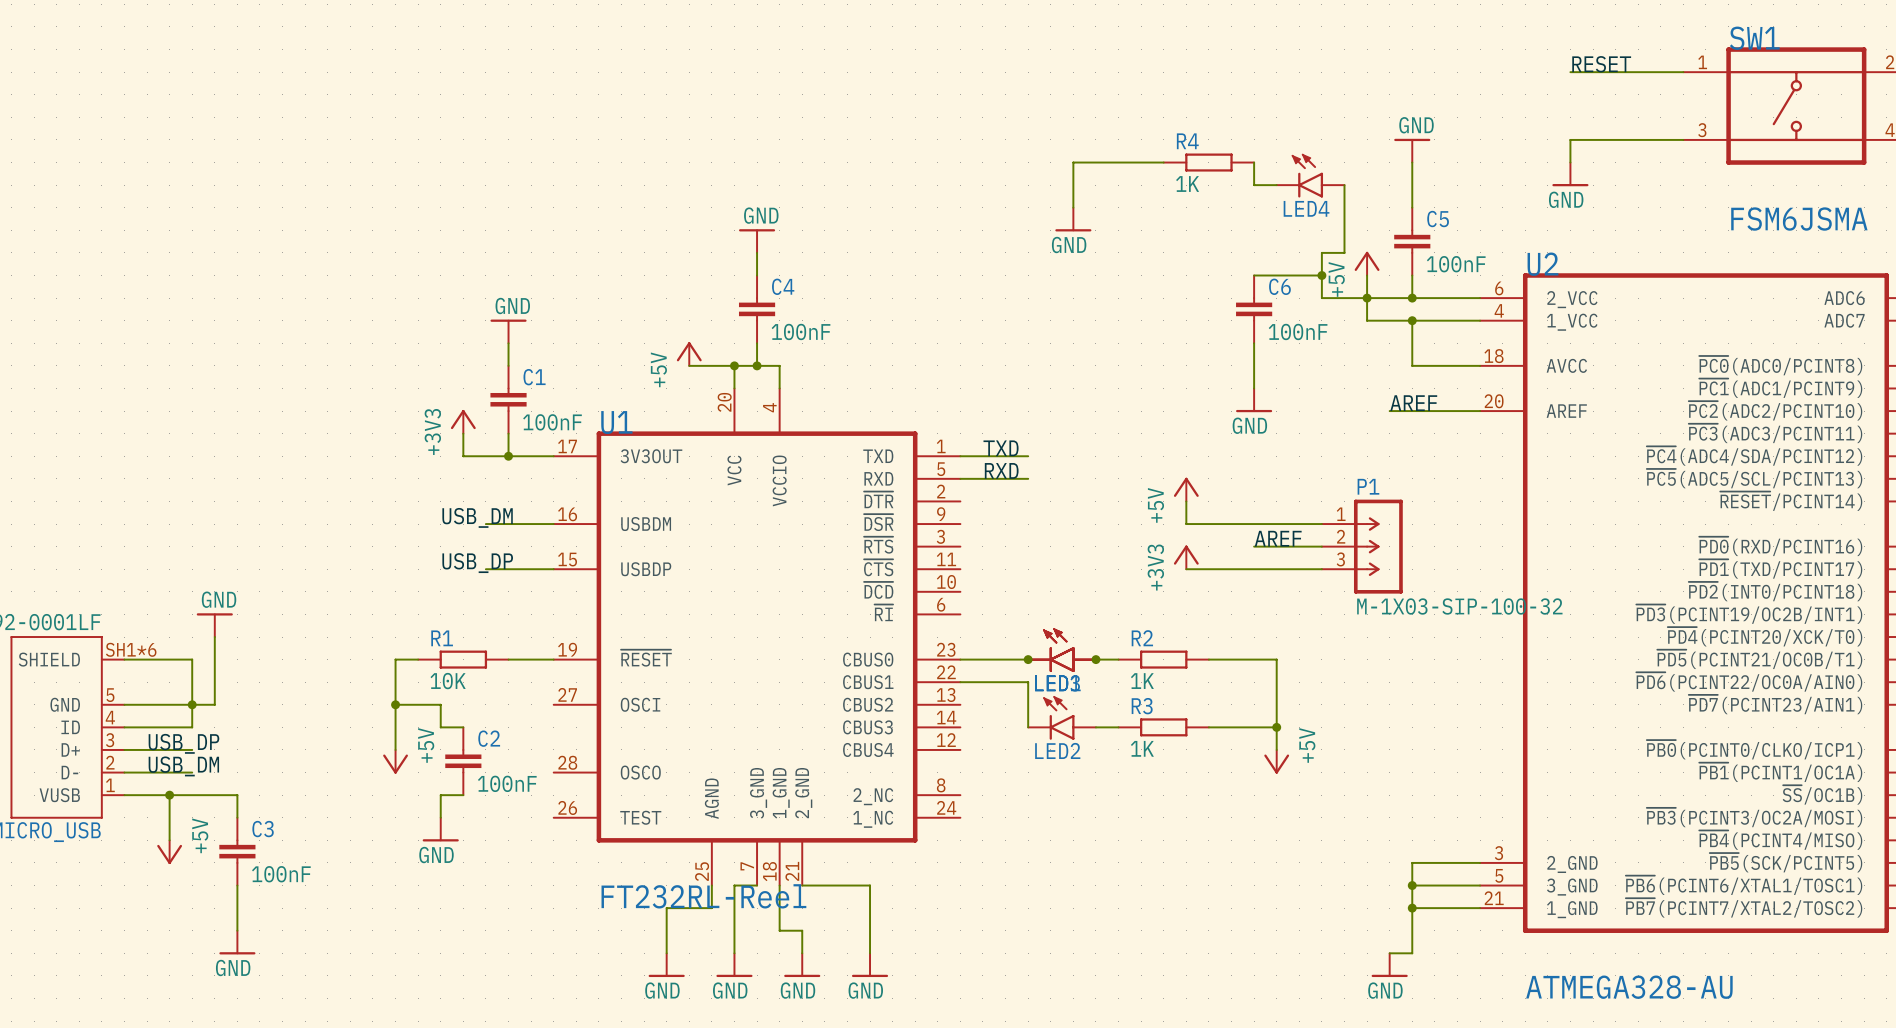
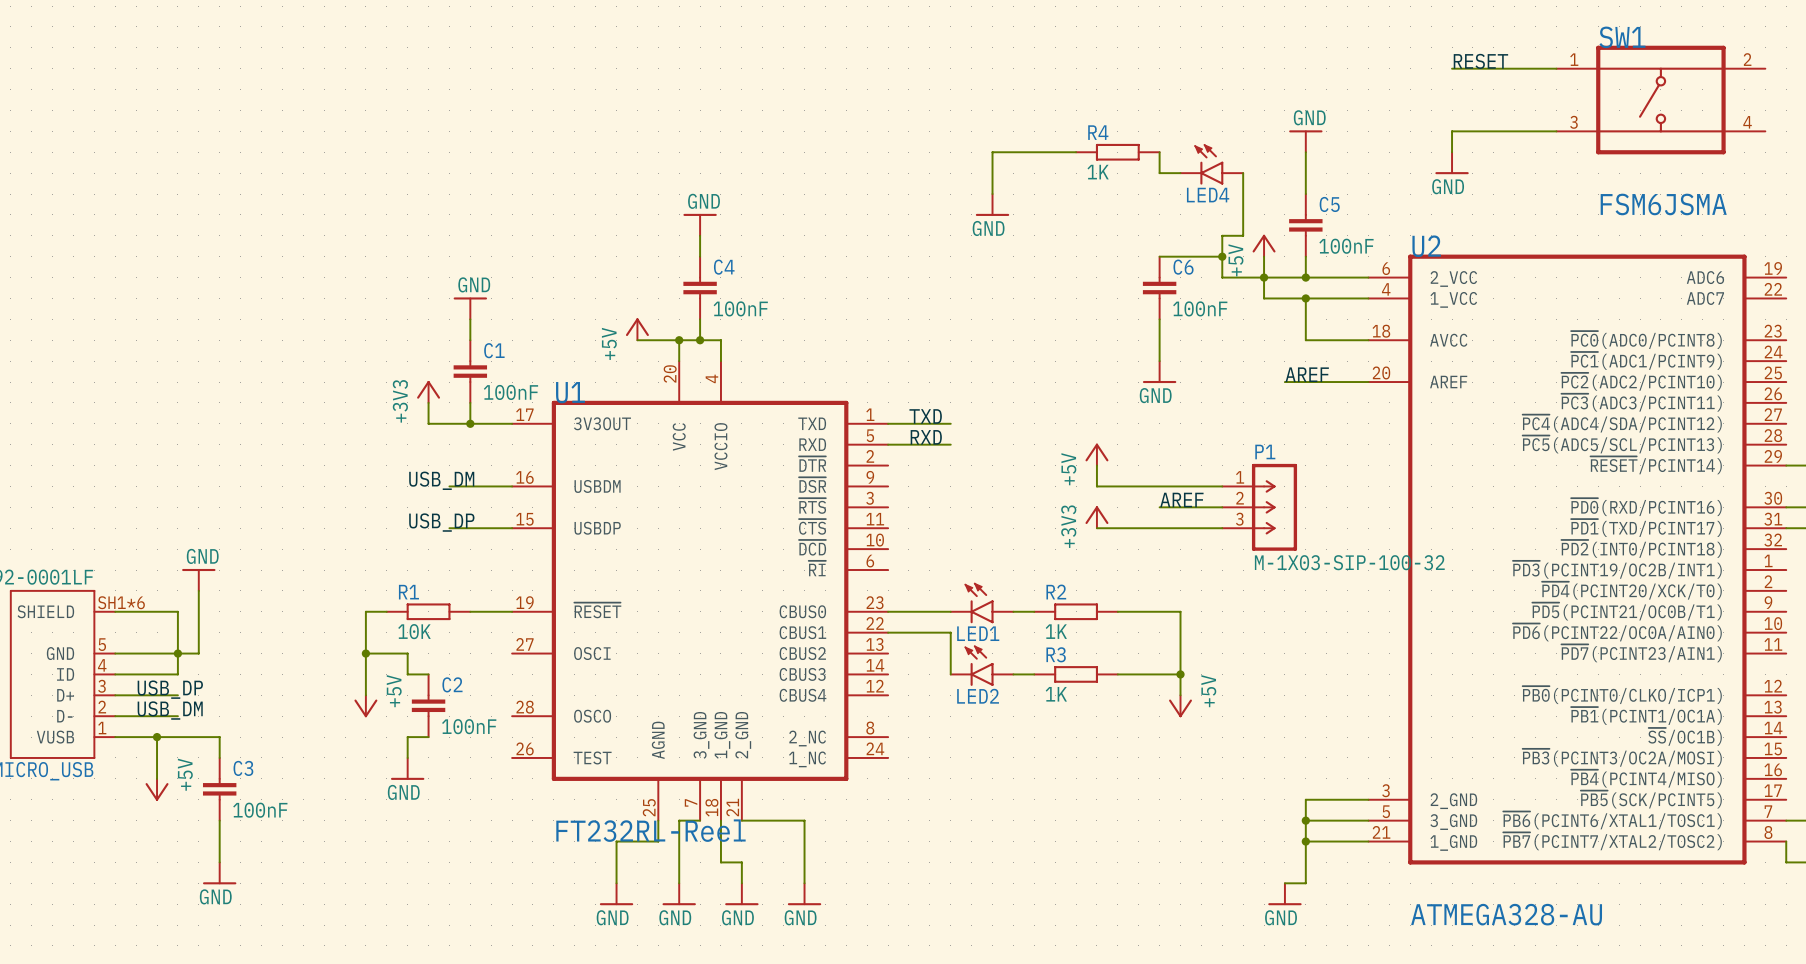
part: (1062, 650) -> none
junction: (1028, 659) -> none
junction: (1095, 659) -> none

